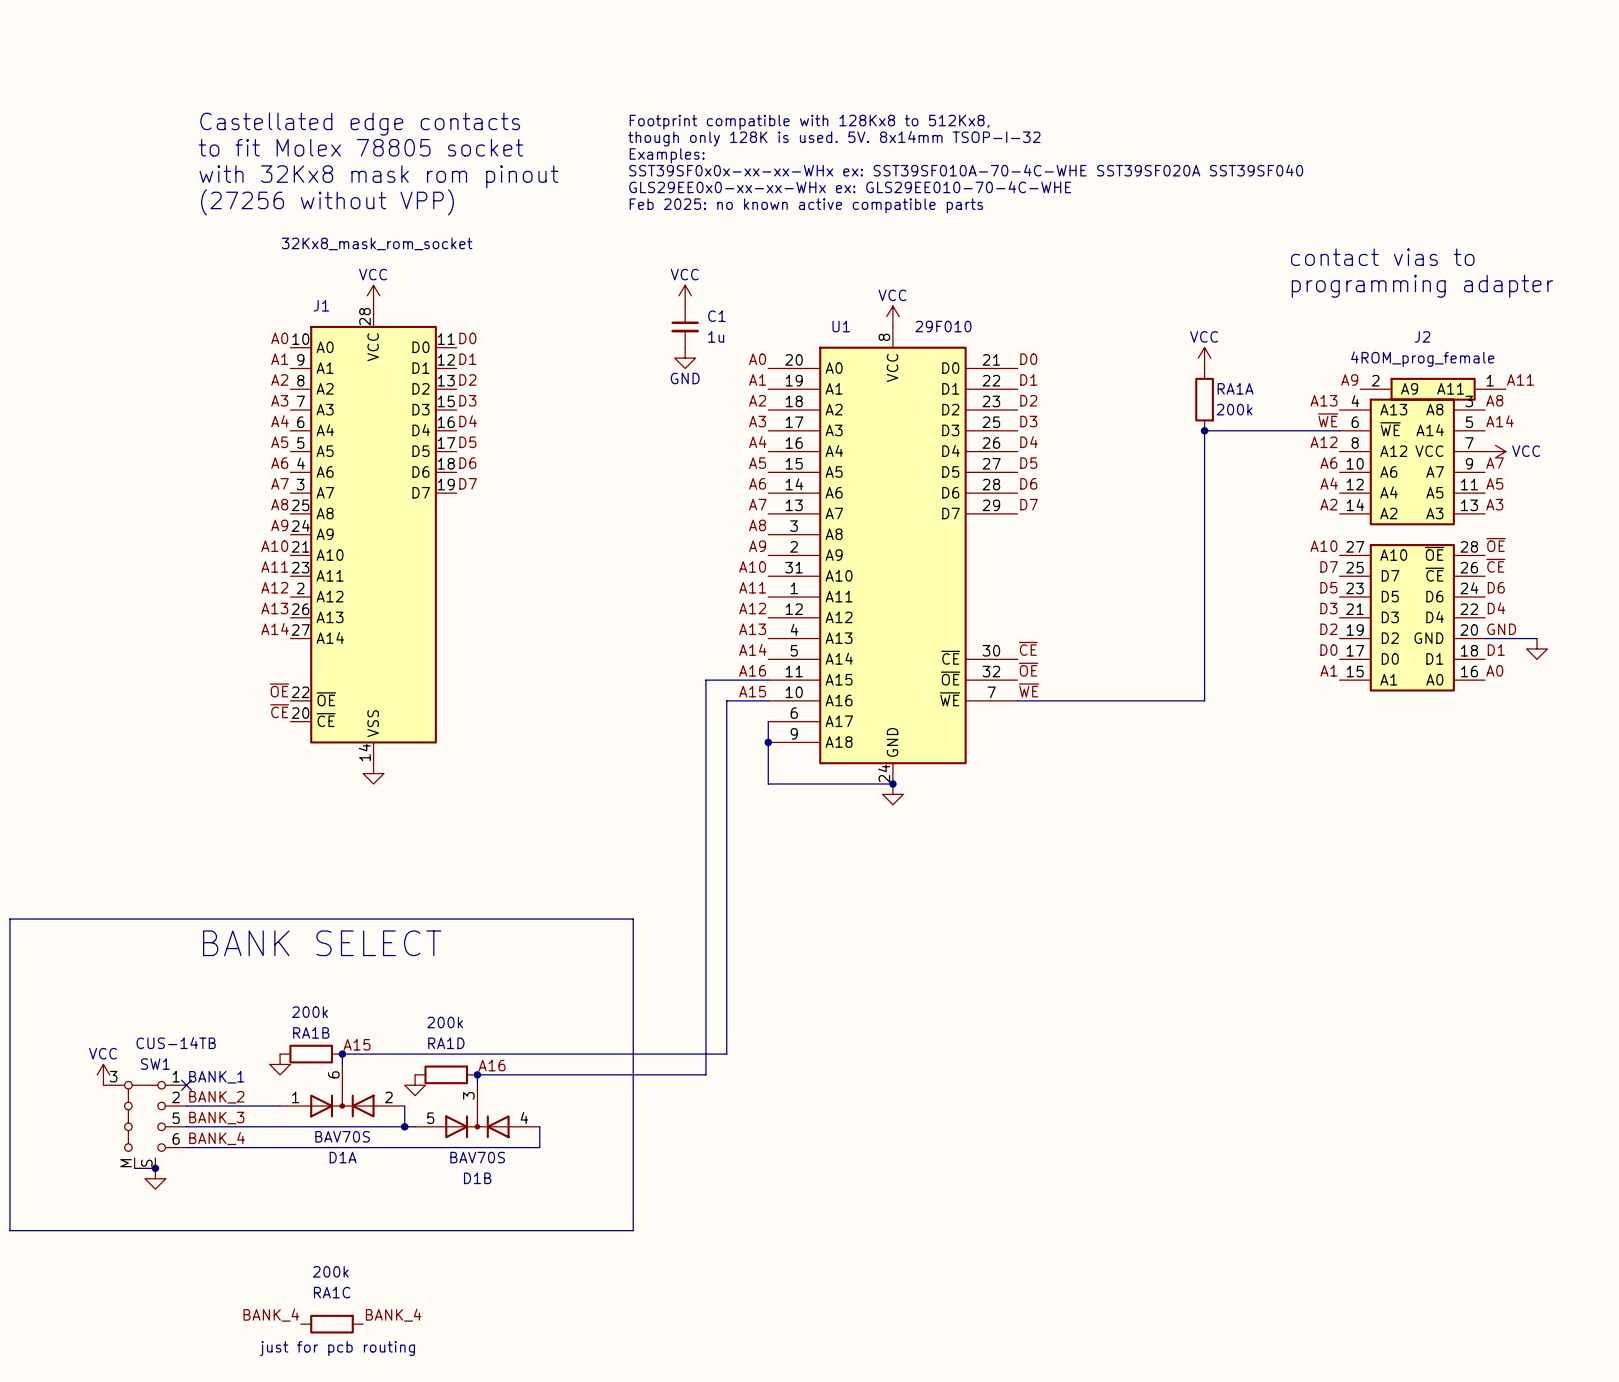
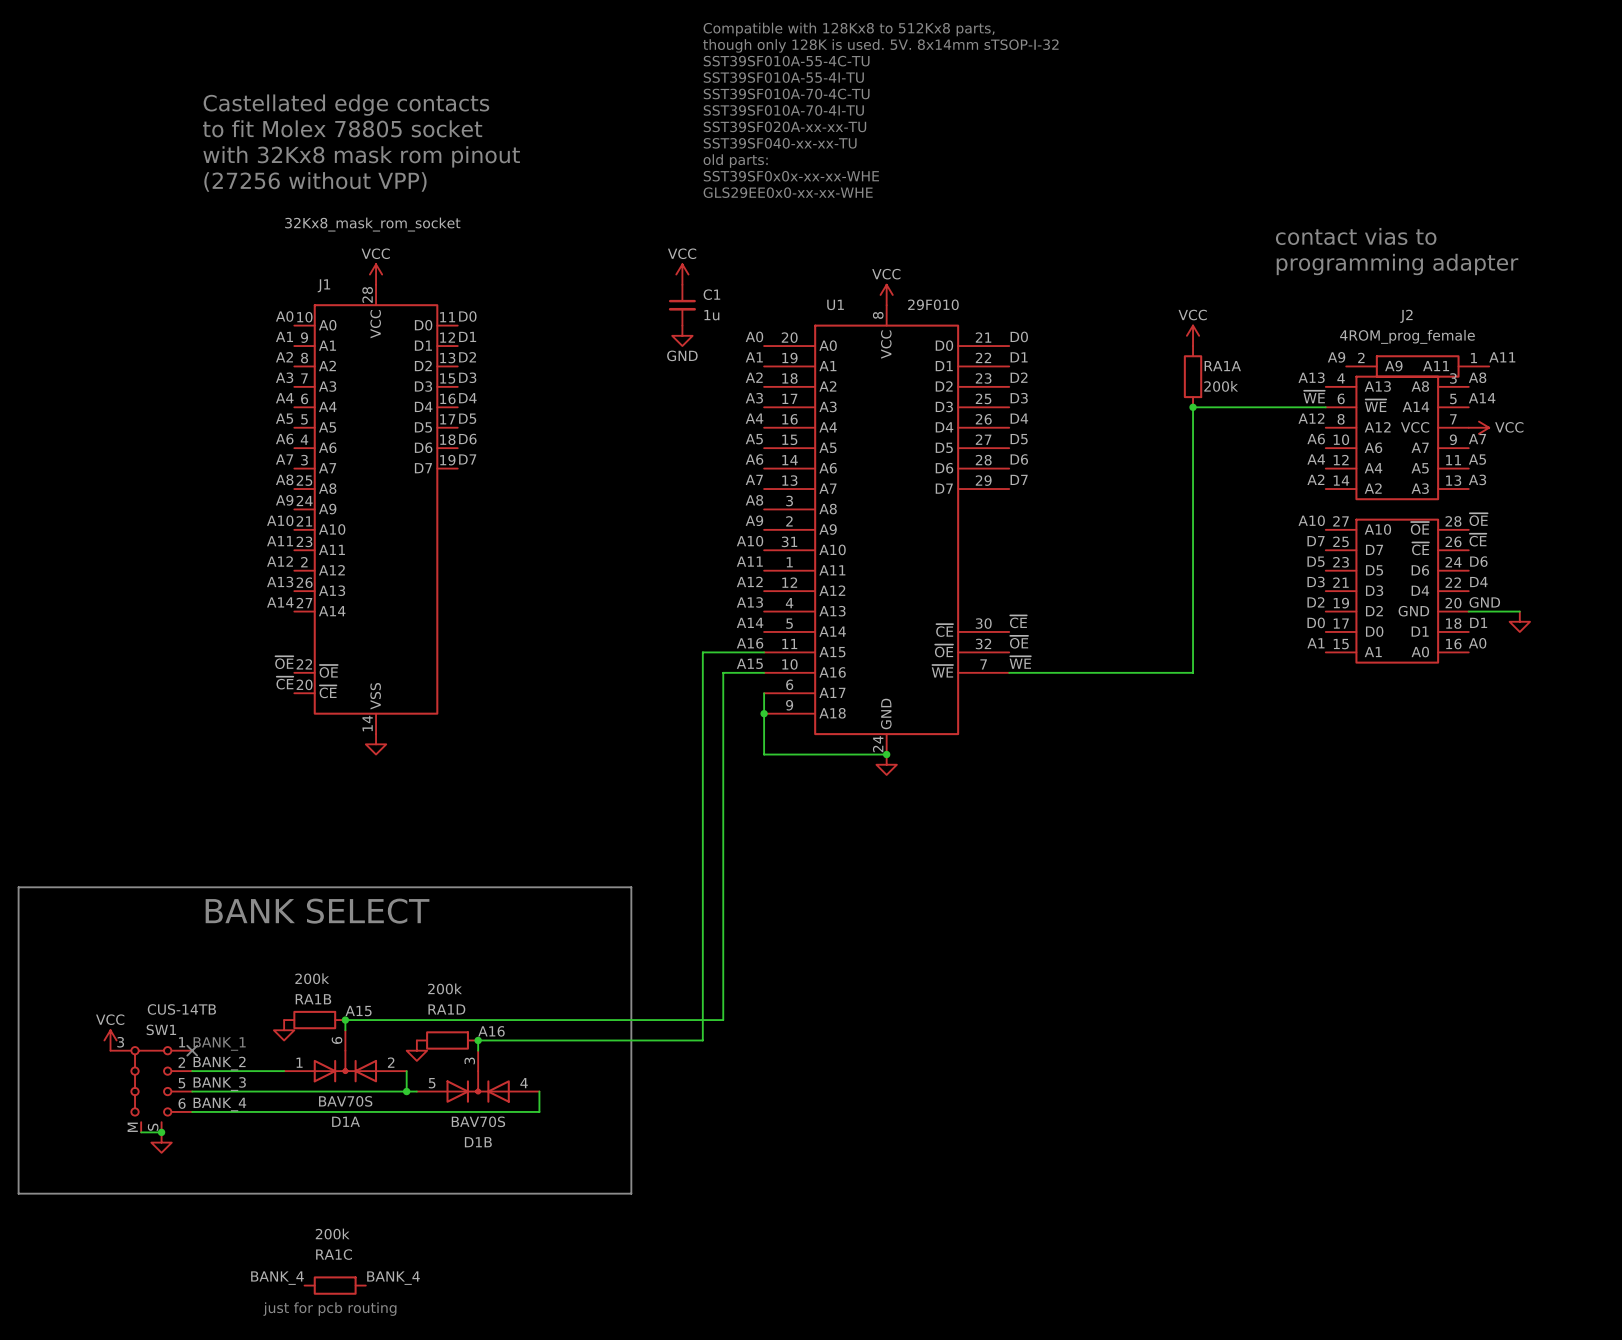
text: none -> Compatible with 128Kx8 to 512Kx8 parts, (849, 29)
text: none -> though only 128K is used. 5V. 8x14mm sTSOP-I-32 (880, 45)
text: none -> SST39SF010A-55-4C-TU (786, 61)
text: none -> SST39SF010A-55-4I-TU (783, 77)
text: none -> SST39SF010A-70-4C-TU (786, 94)
text: Footprint compatible with 128Kx8 to 512Kx8, (809, 122) -> none
text: none -> SST39SF010A-70-4I-TU (783, 110)
text: though only 128K is used. 5V. 8x14mm TSOP-I-32 (834, 138) -> none
text: none -> SST39SF020A-xx-xx-TU (784, 126)
text: Examples: (667, 155) -> none
text: none -> SST39SF040-xx-xx-TU (780, 143)
text: SST39SF0x0x-xx-xx-WHx ex: SST39SF010A-70-4C-WHE SST39SF020A SST39SF040 (966, 170) -> none
text: none -> old parts: (735, 161)
text: GLS29EE0x0-xx-xx-WHx ex: GLS29EE010-70-4C-WHE (850, 187) -> none
text: none -> SST39SF0x0x-xx-xx-WHE (791, 176)
text: Feb 2025: no known active compatible parts (806, 205) -> none
text: none -> GLS29EE0x0-xx-xx-WHE (788, 192)

